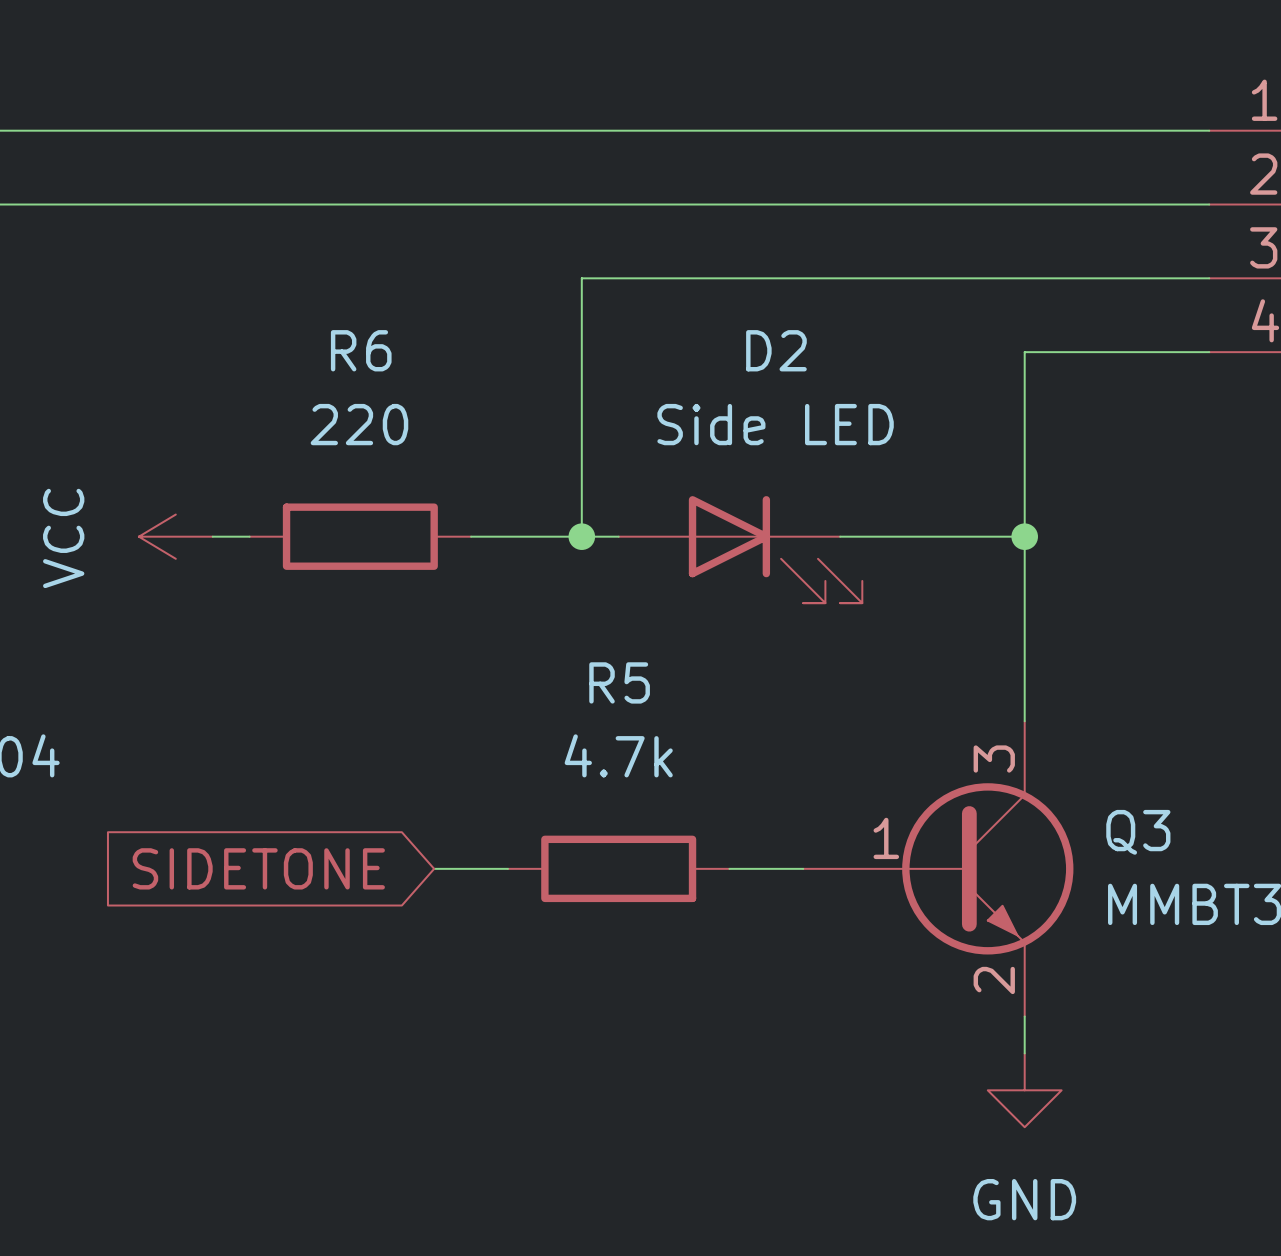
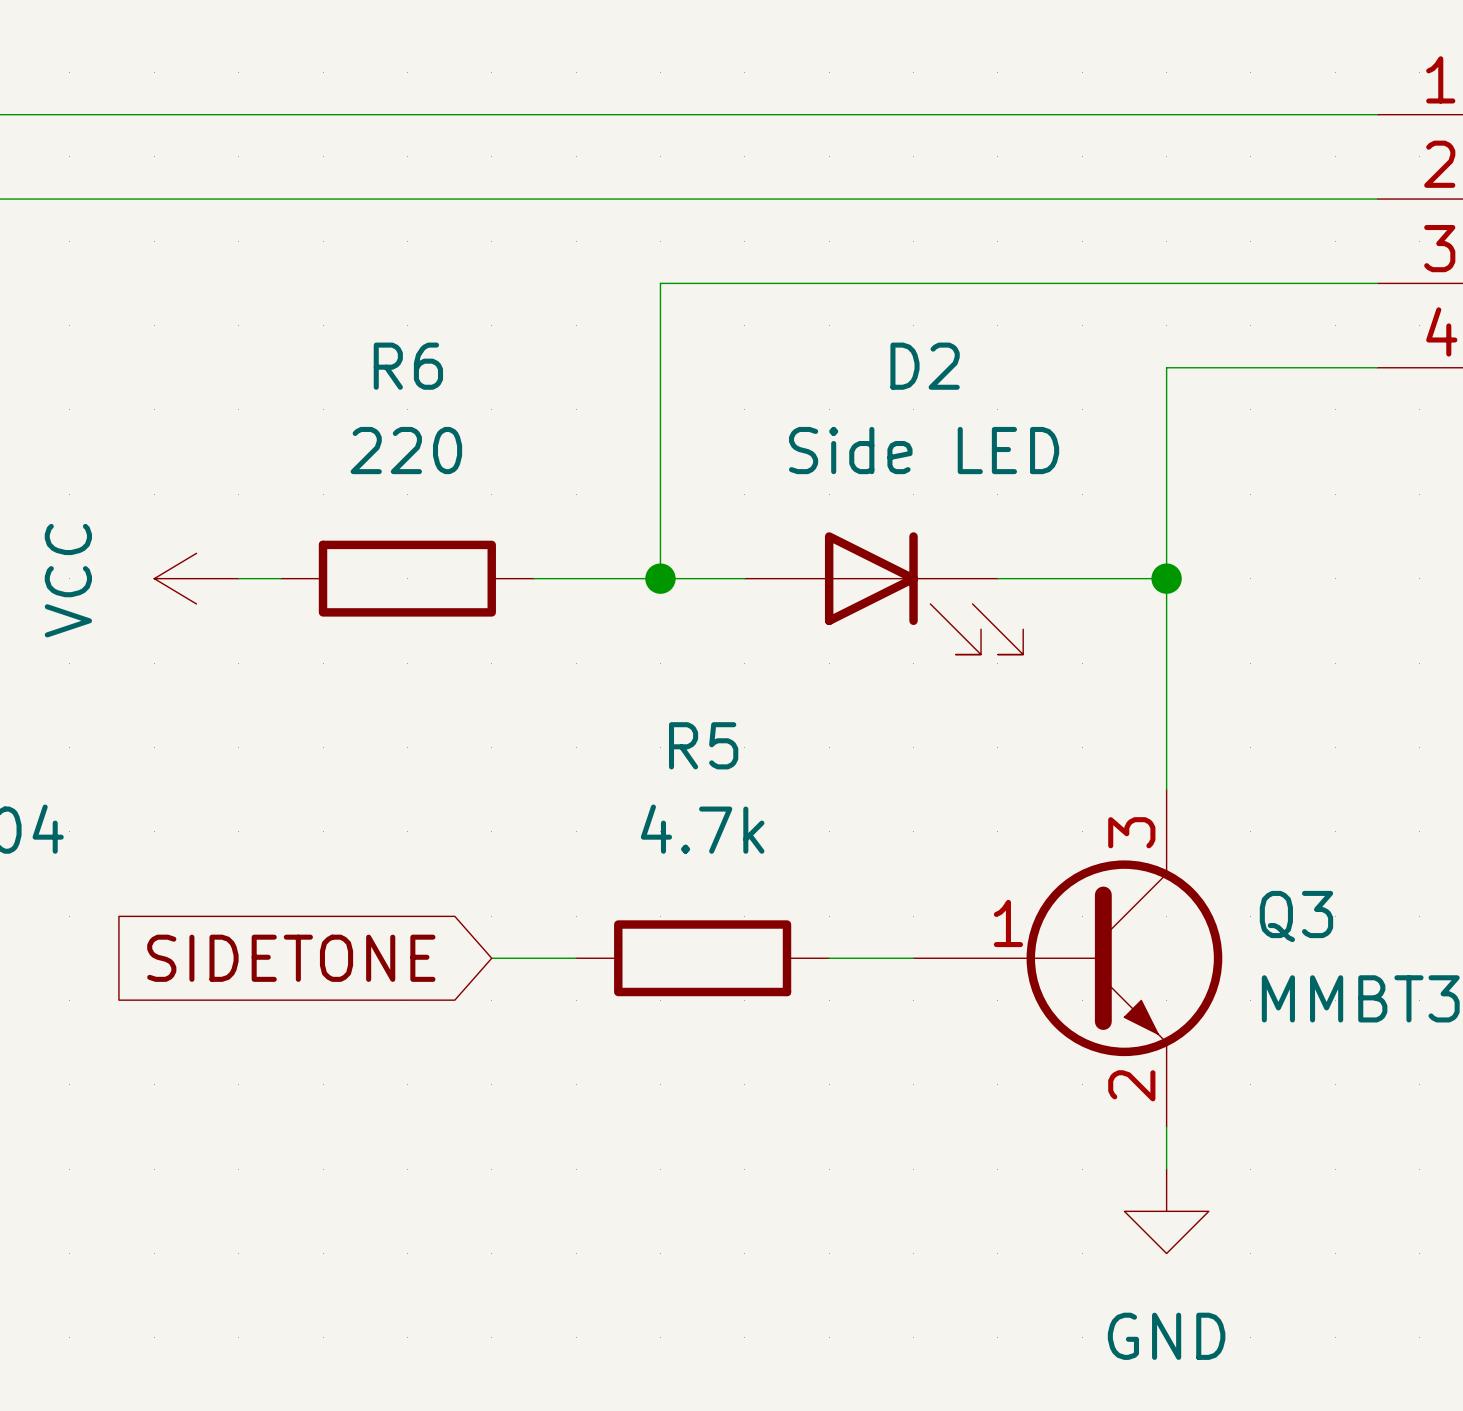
D2 position: (740, 549) -> (884, 593)

